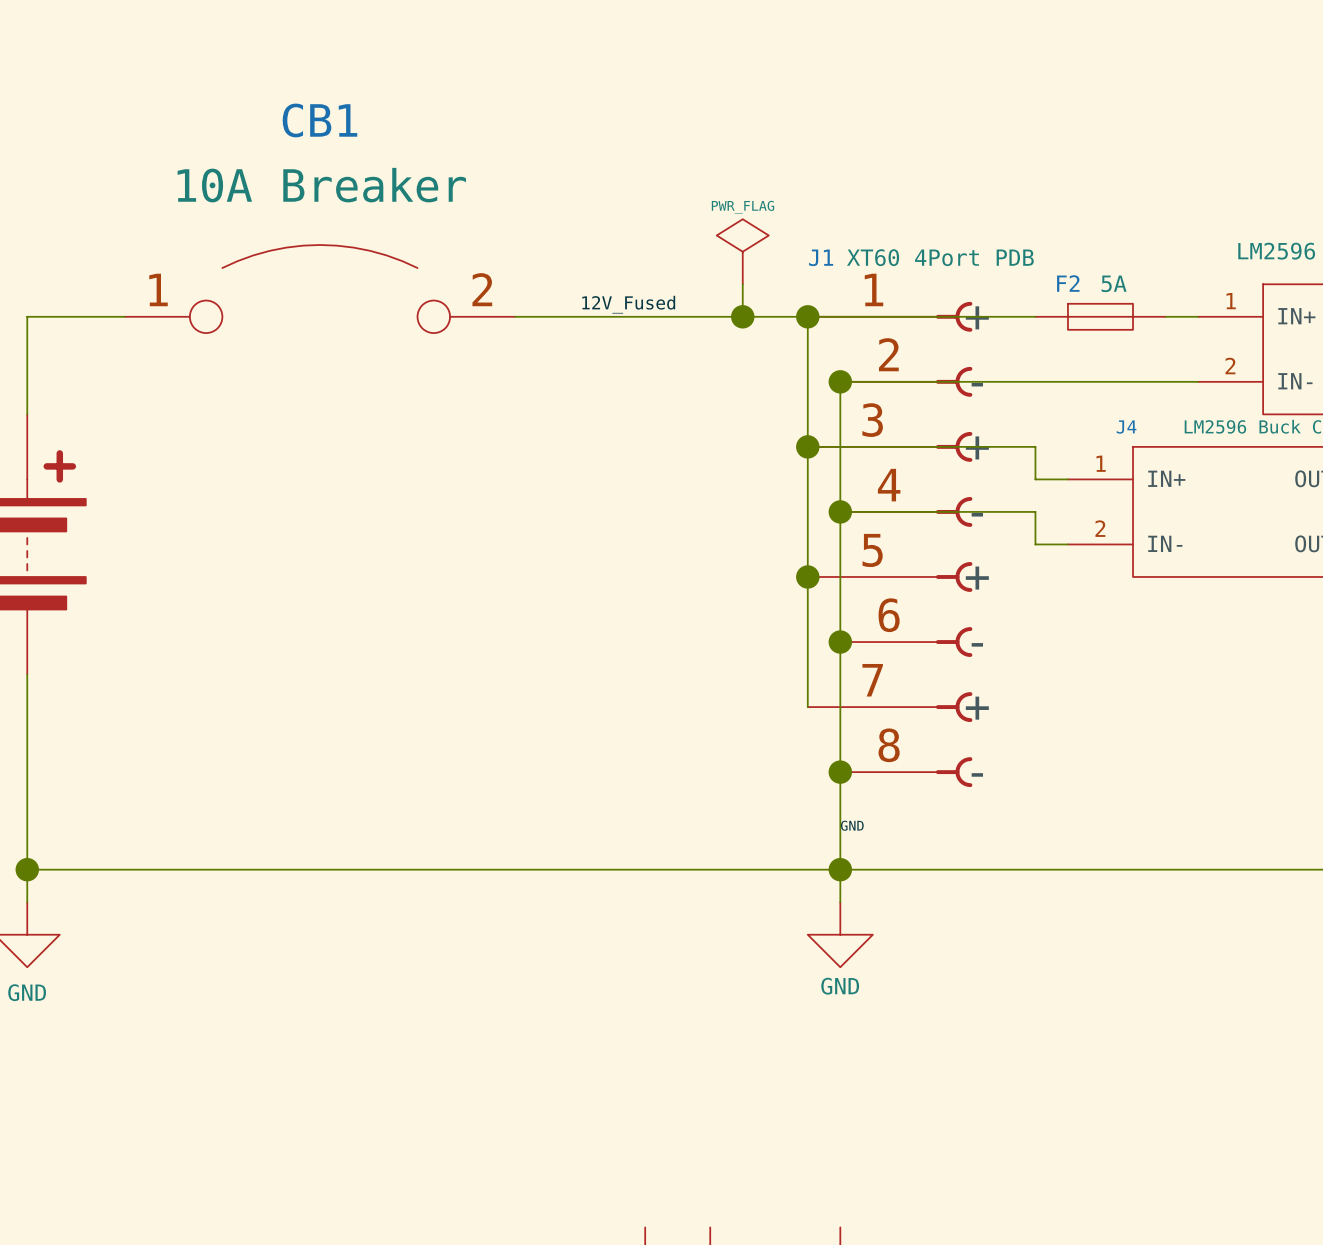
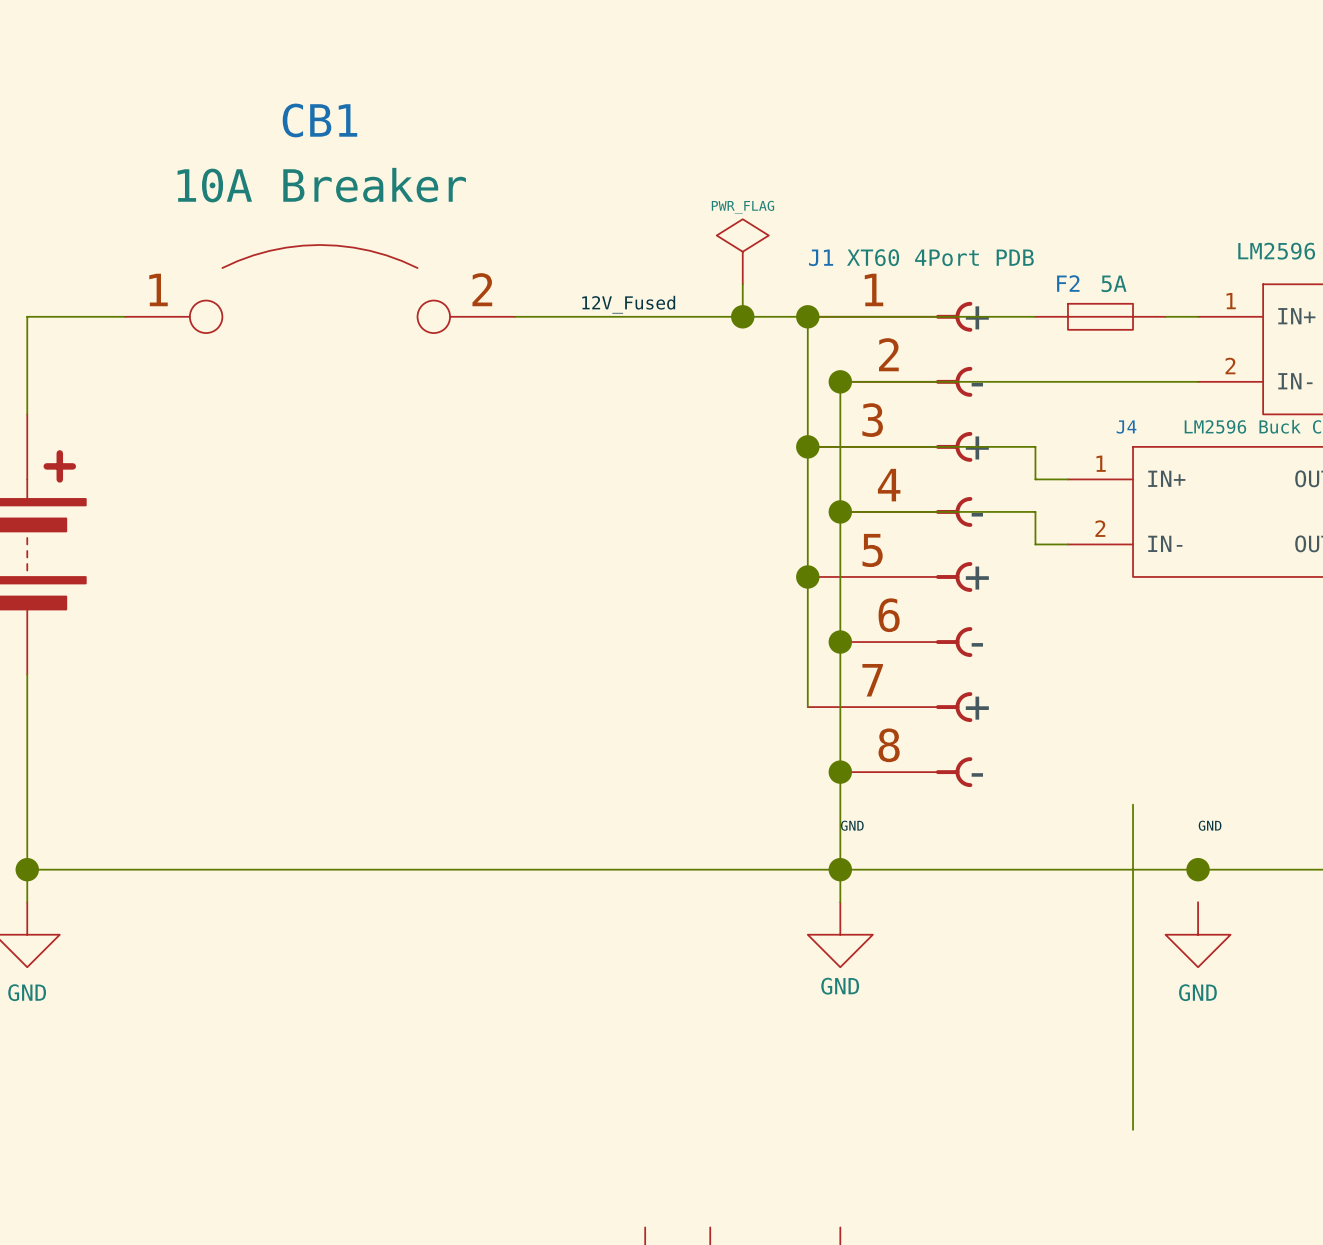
wire: none -> (1133, 804) (1133, 1129)
label: none -> GND (1210, 825)
junction: none -> (1198, 869)
power symbol: none -> GND (1198, 934)

